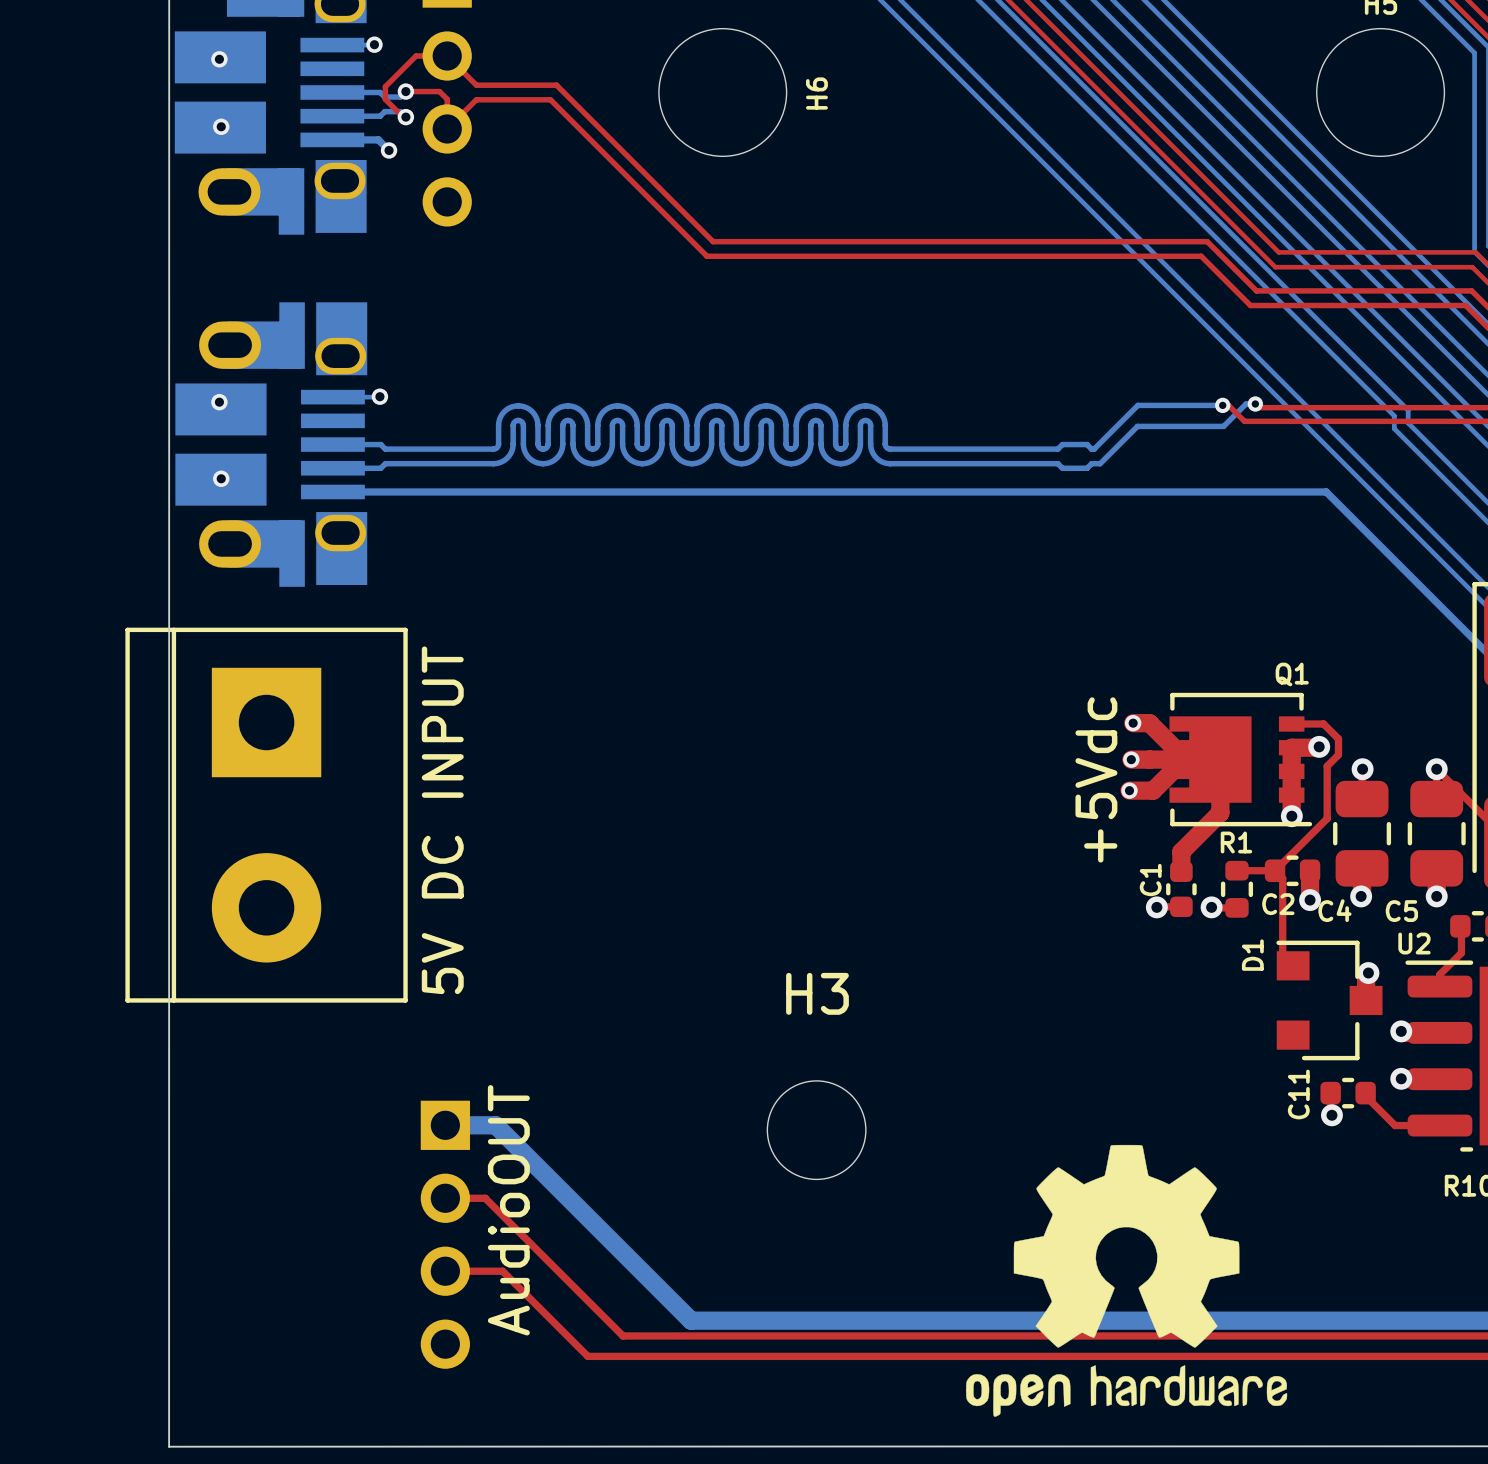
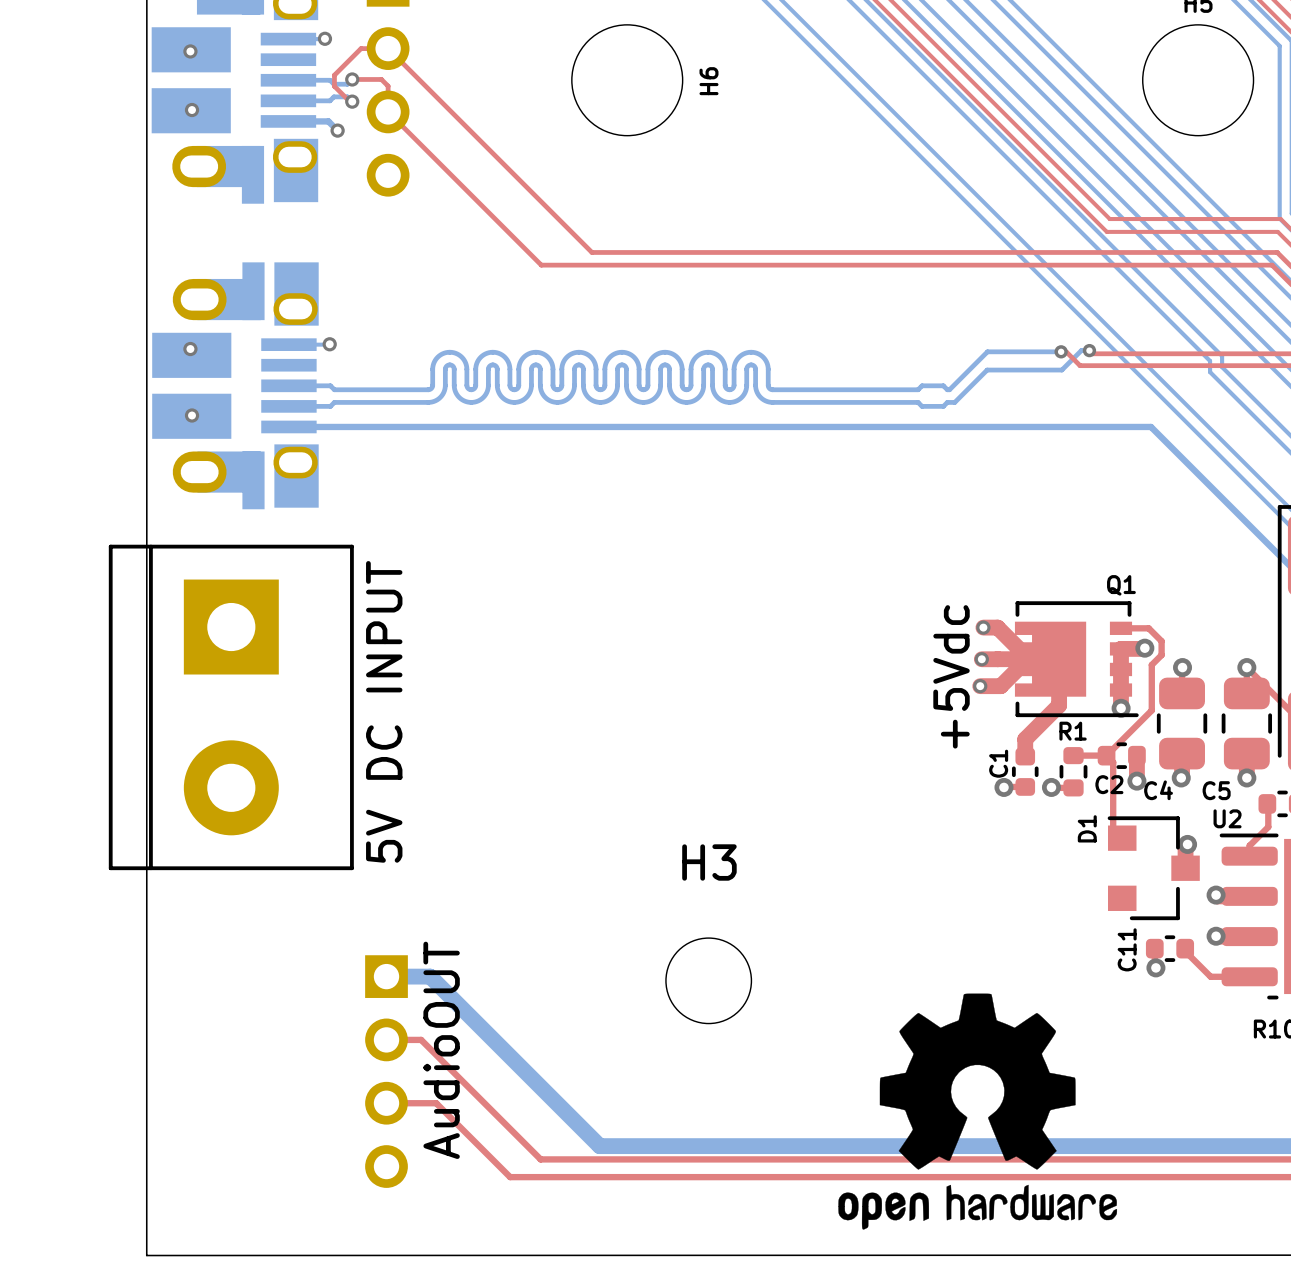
top track: (476, 85) (556, 85) (713, 241) (1207, 241) (1256, 290) -> (413, 73) (591, 252) (1090, 252)
top track: (447, 128) (476, 99) (550, 99) (707, 256) (1201, 256) (1250, 305) -> (388, 111) (541, 265) (1085, 265)

